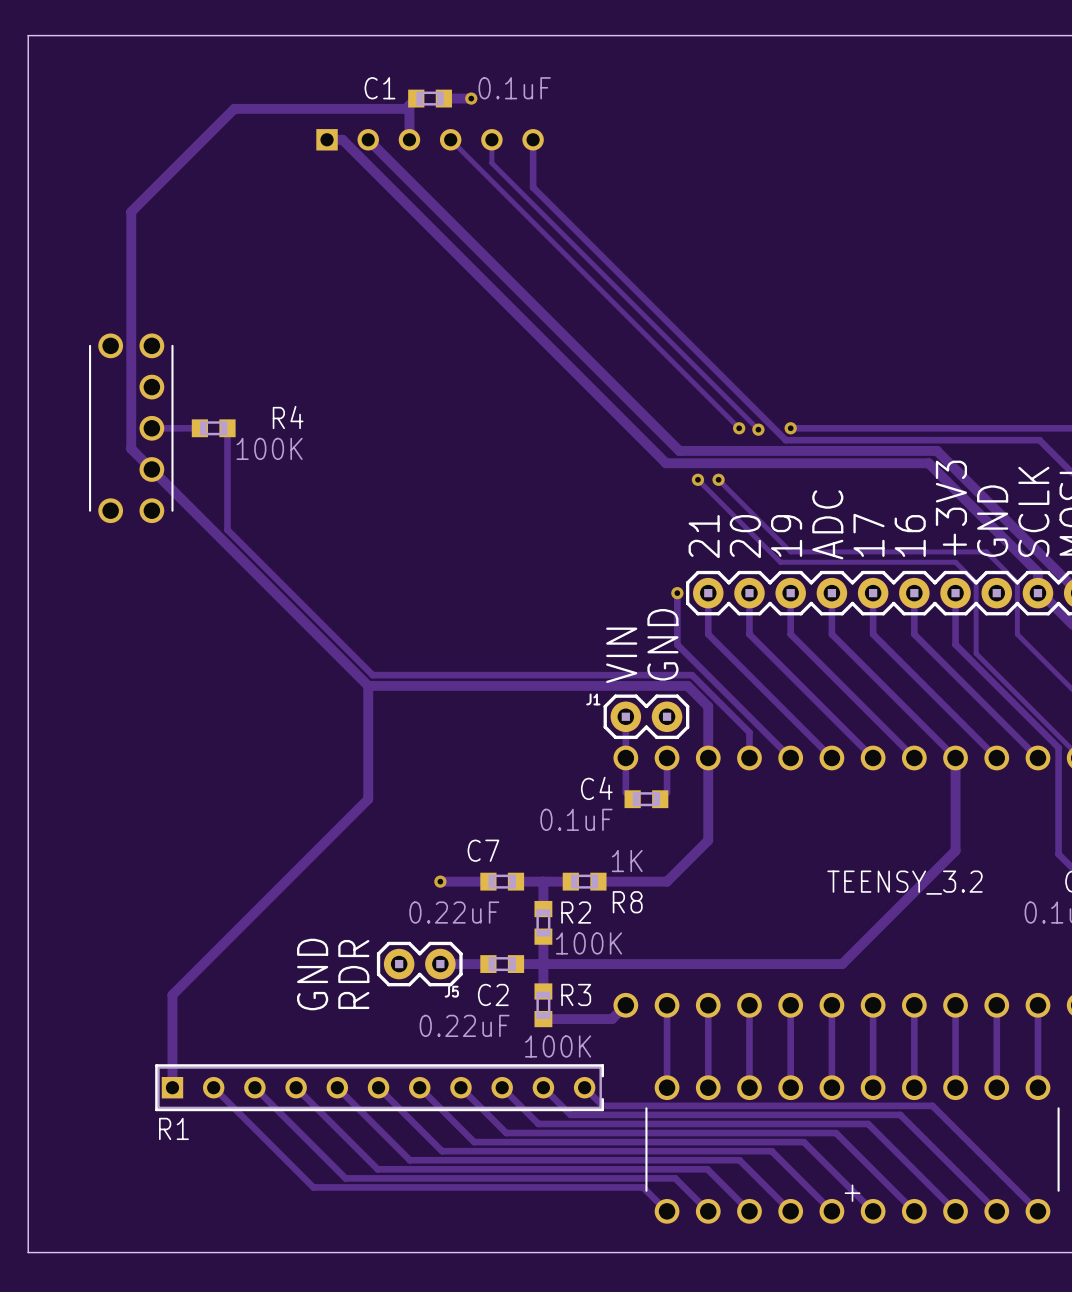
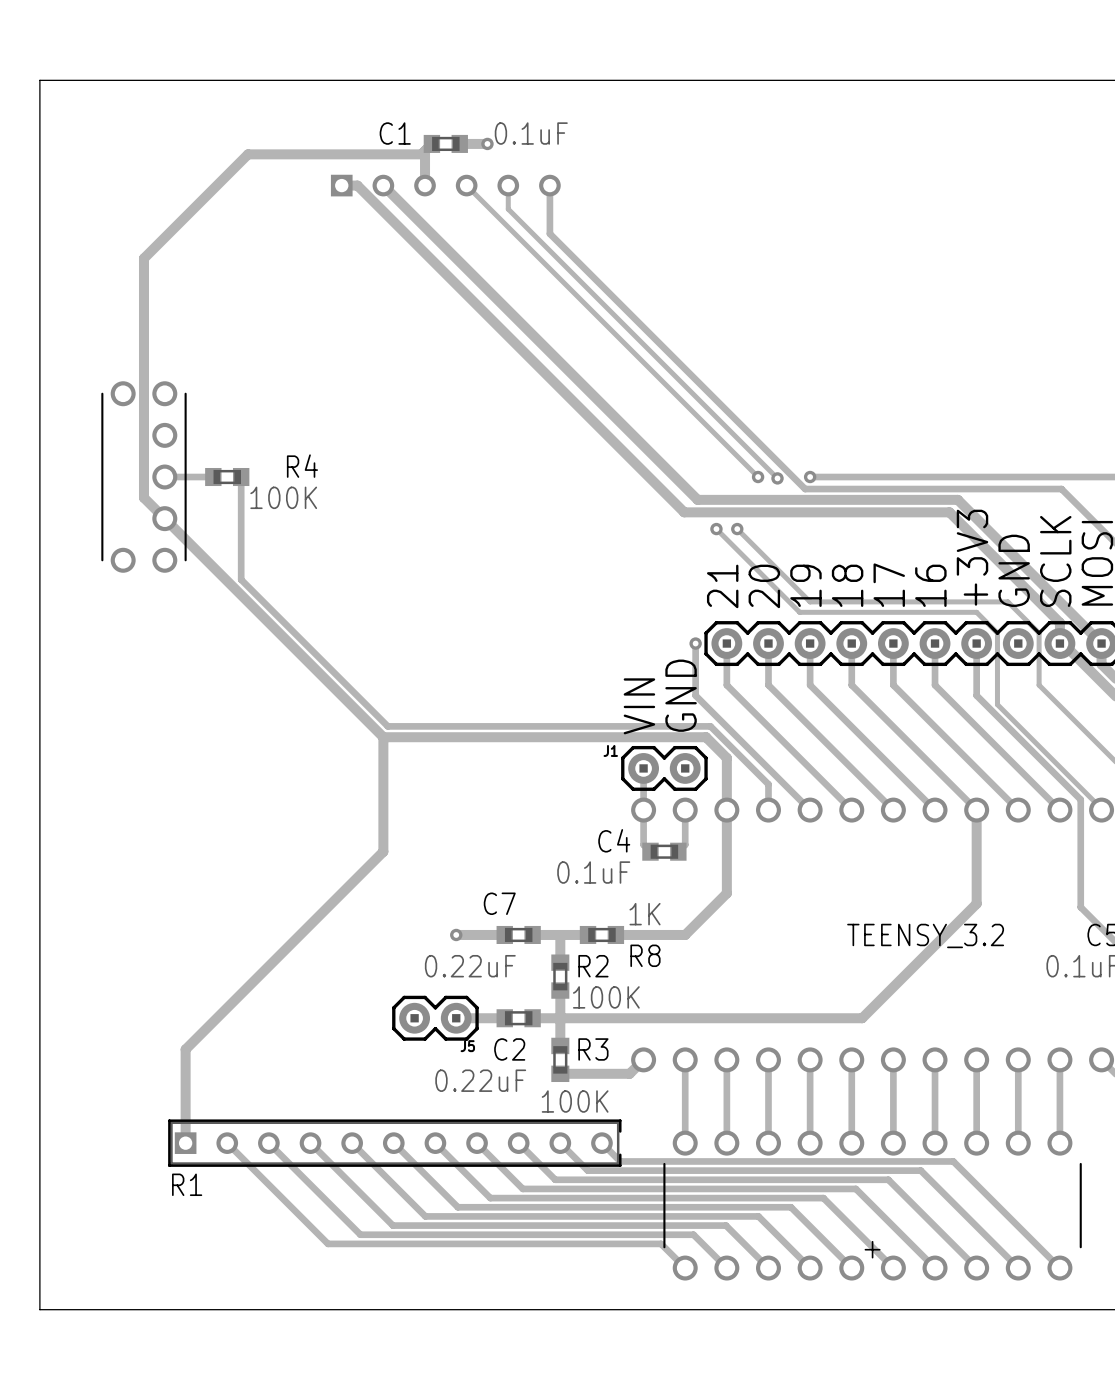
text: ADC (827, 524) -> 18 (847, 585)
text: GND (312, 974) -> none
text: RDR (353, 974) -> none

